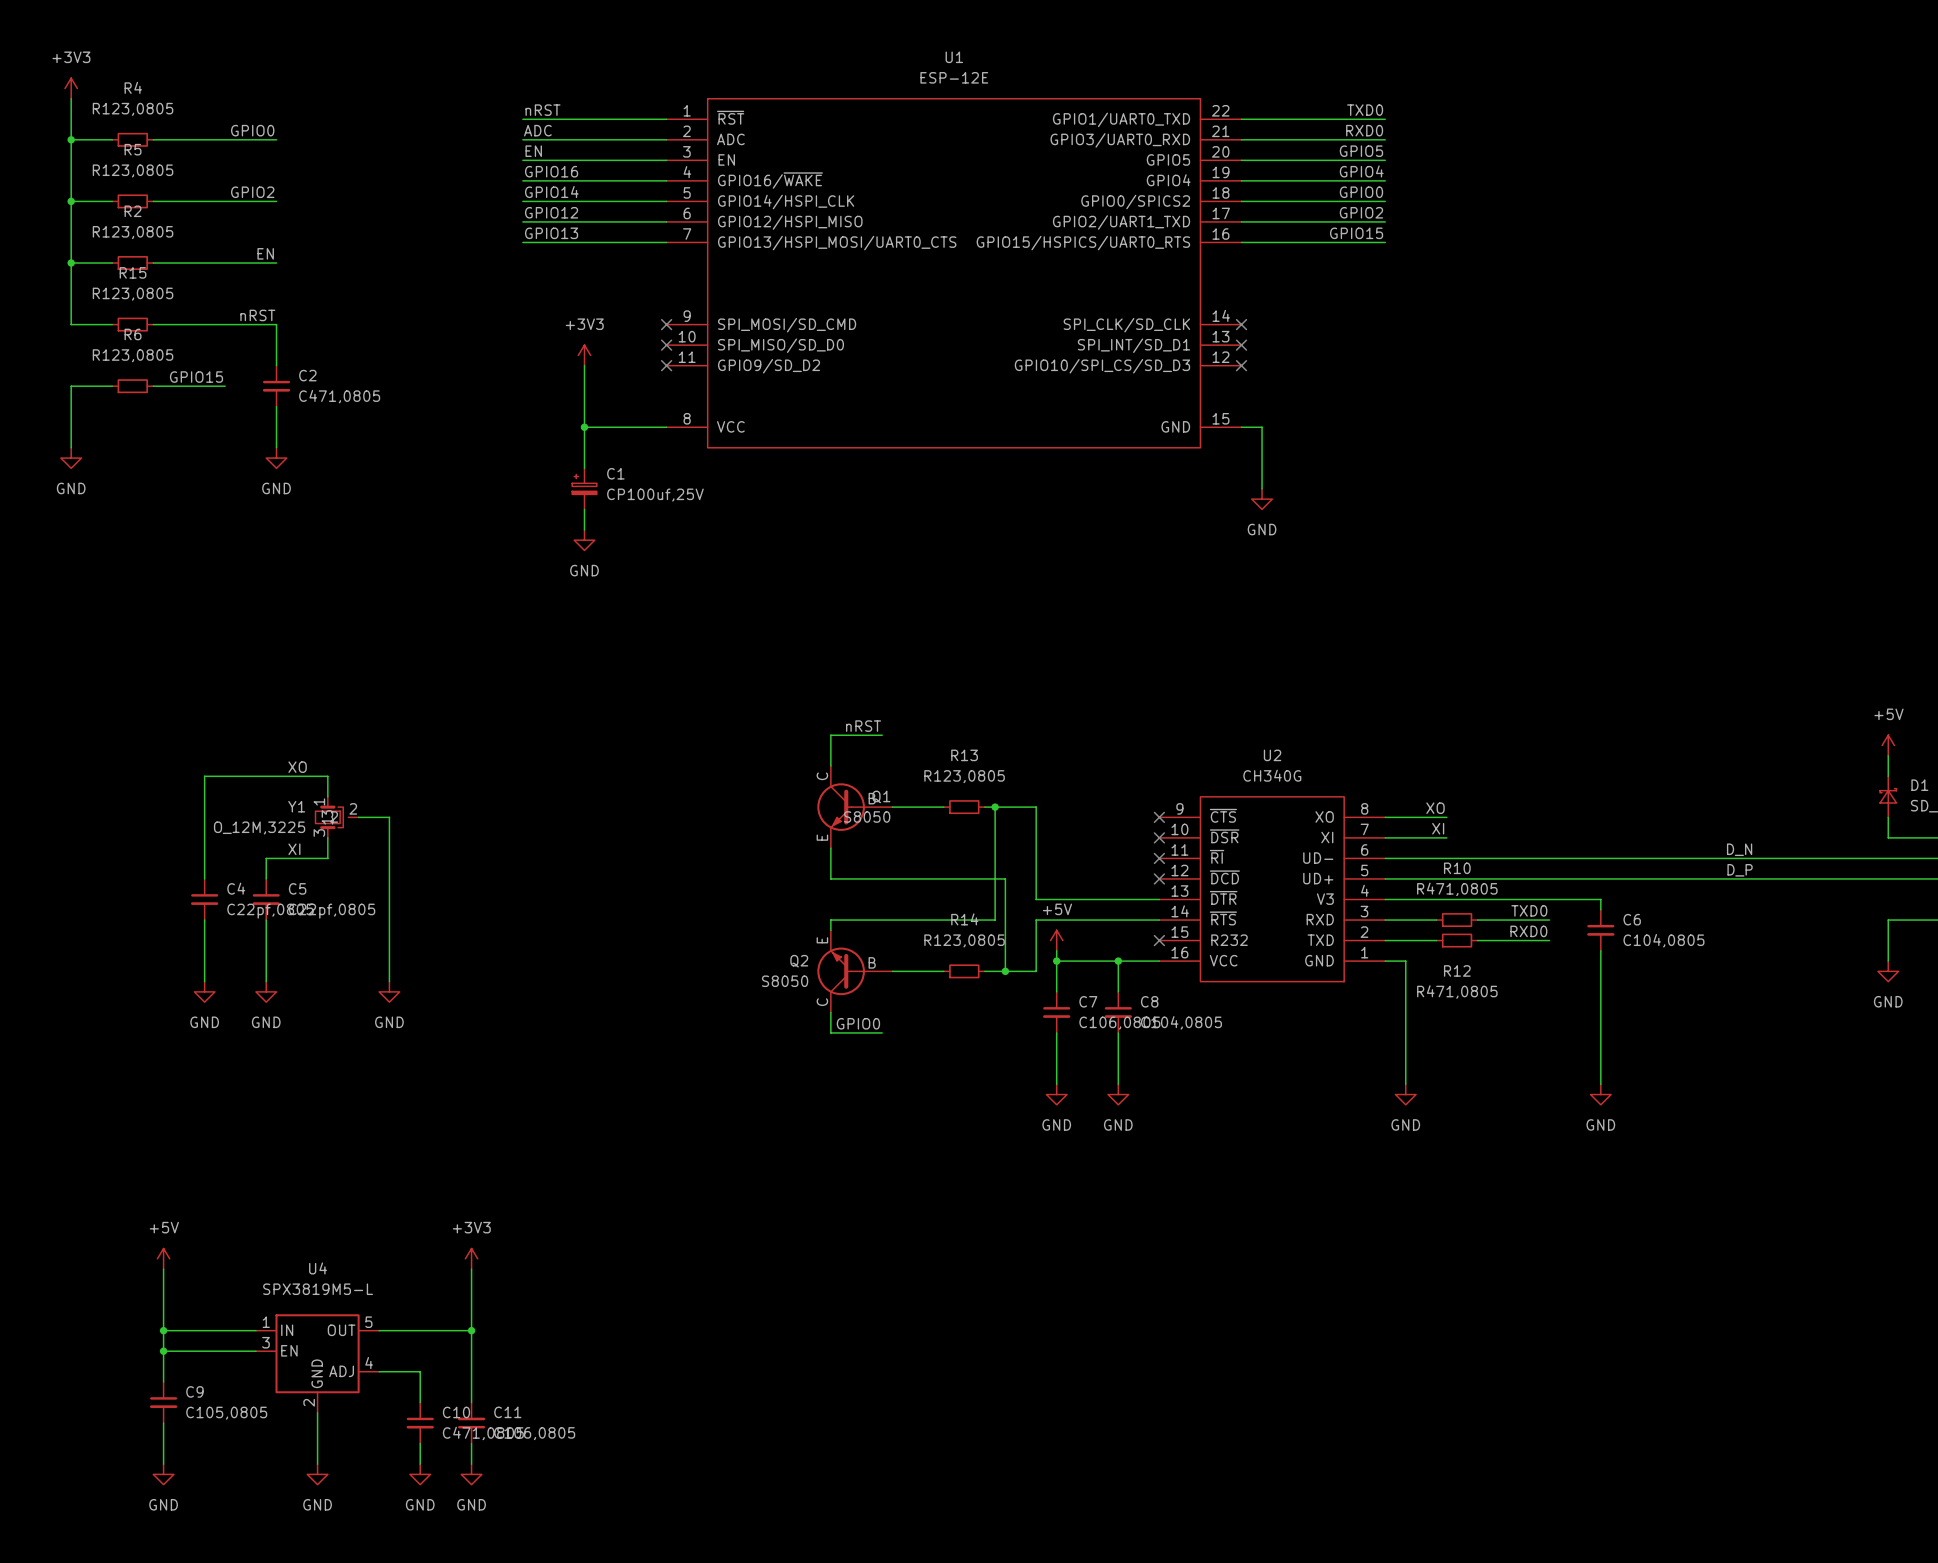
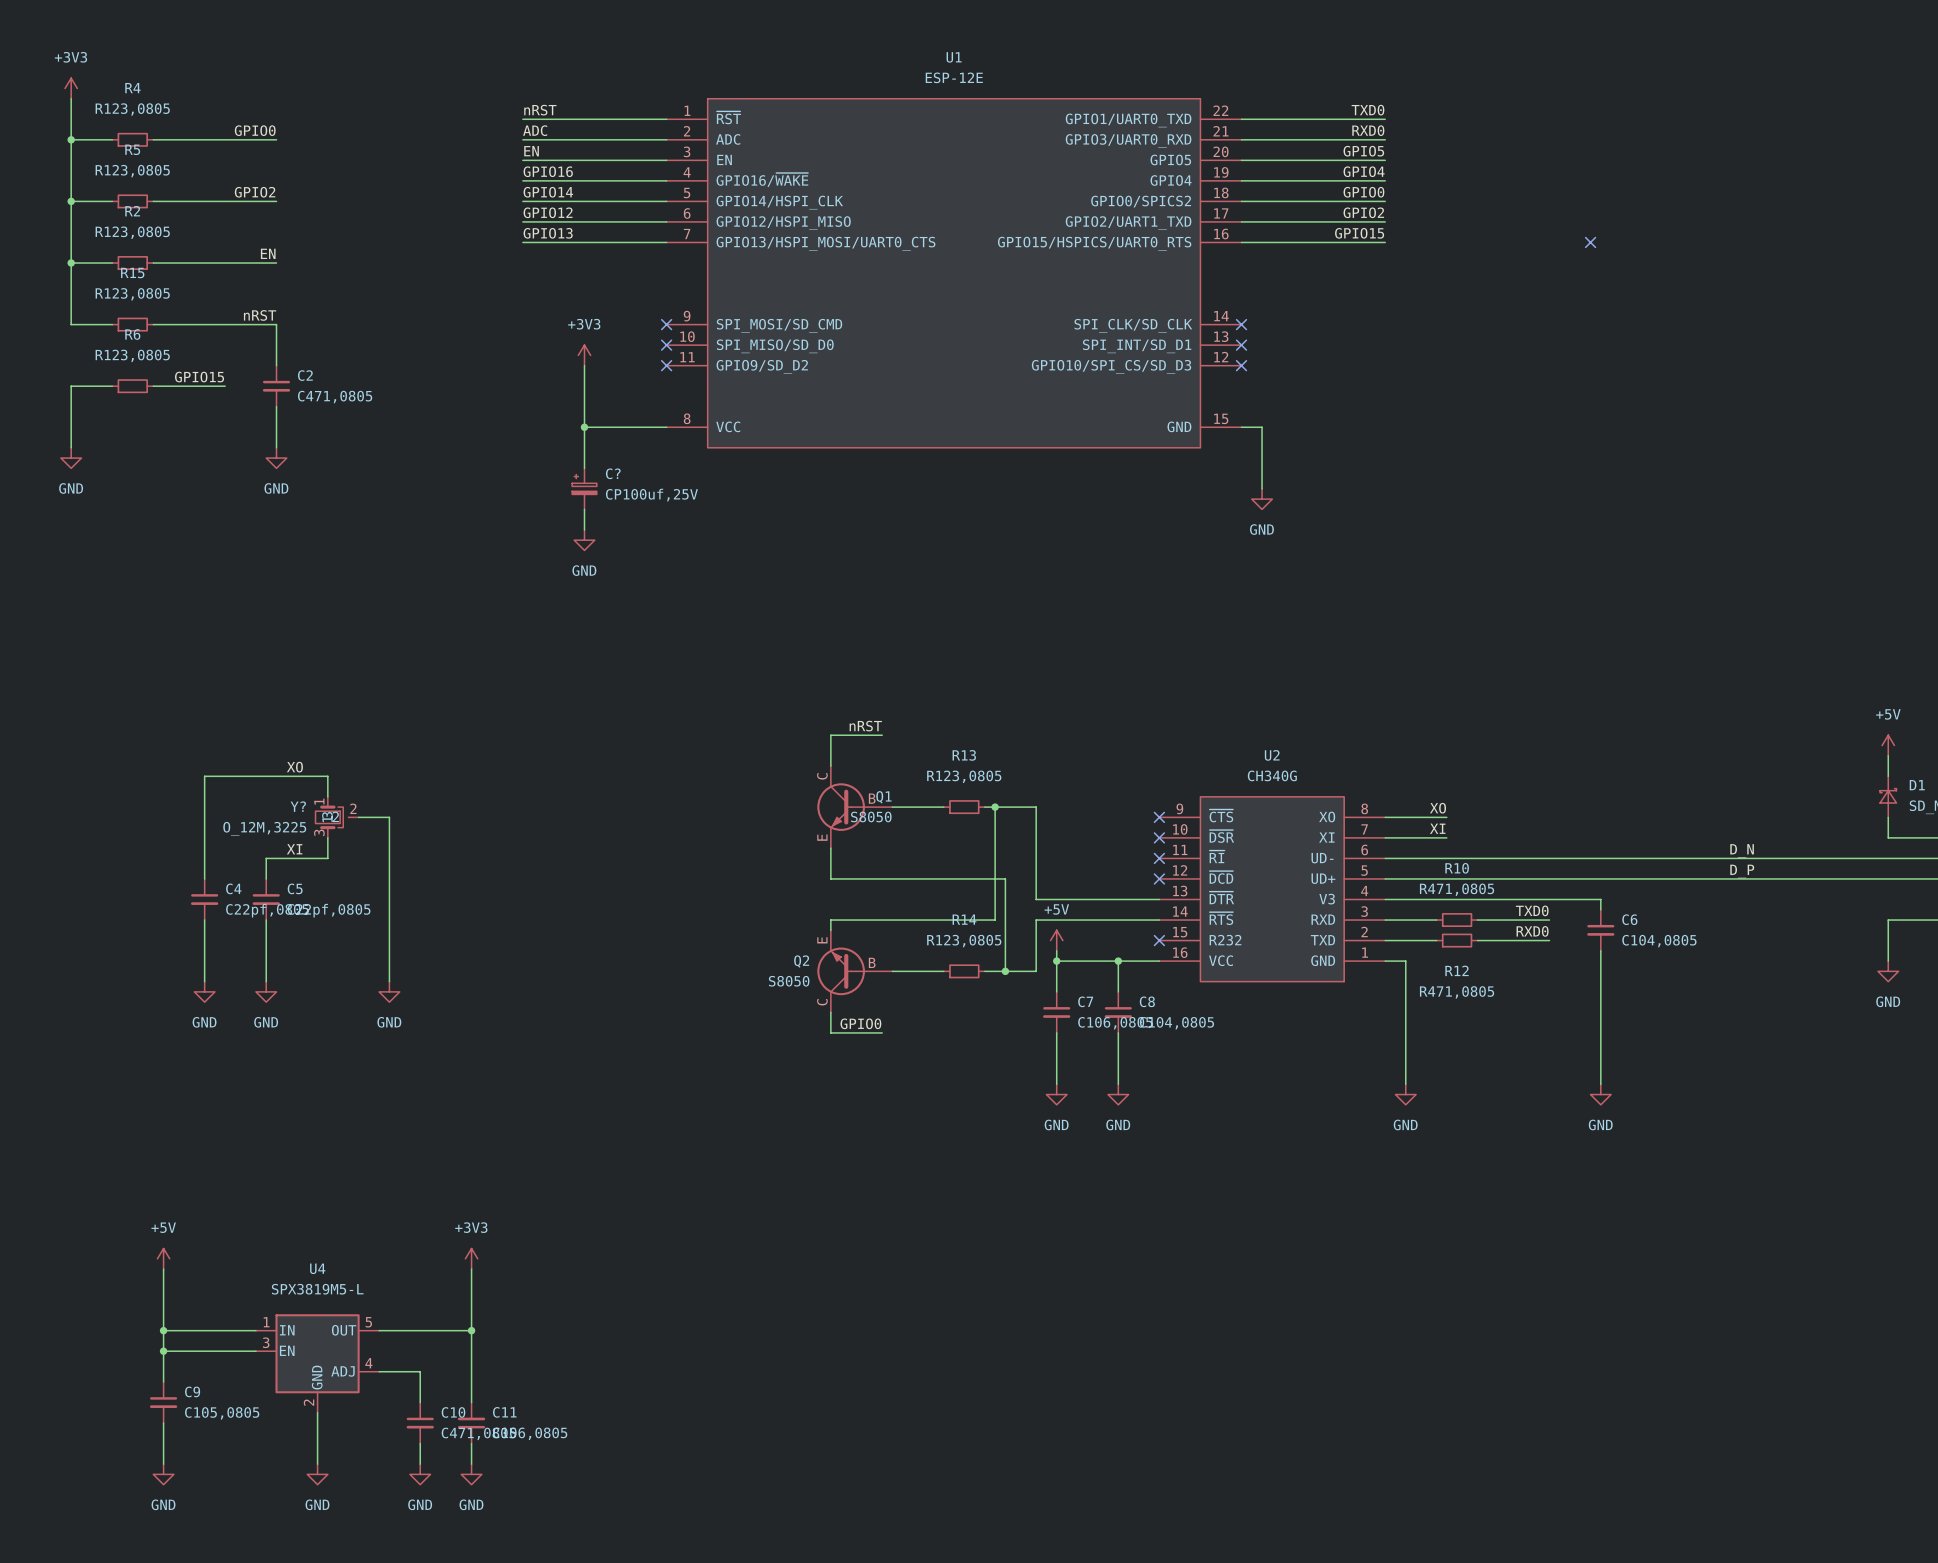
no-connect mark: none -> (1590, 242)
C1 name: C1 (615, 473) -> C? (613, 473)
Y1 name: Y1 (296, 806) -> Y? (298, 806)

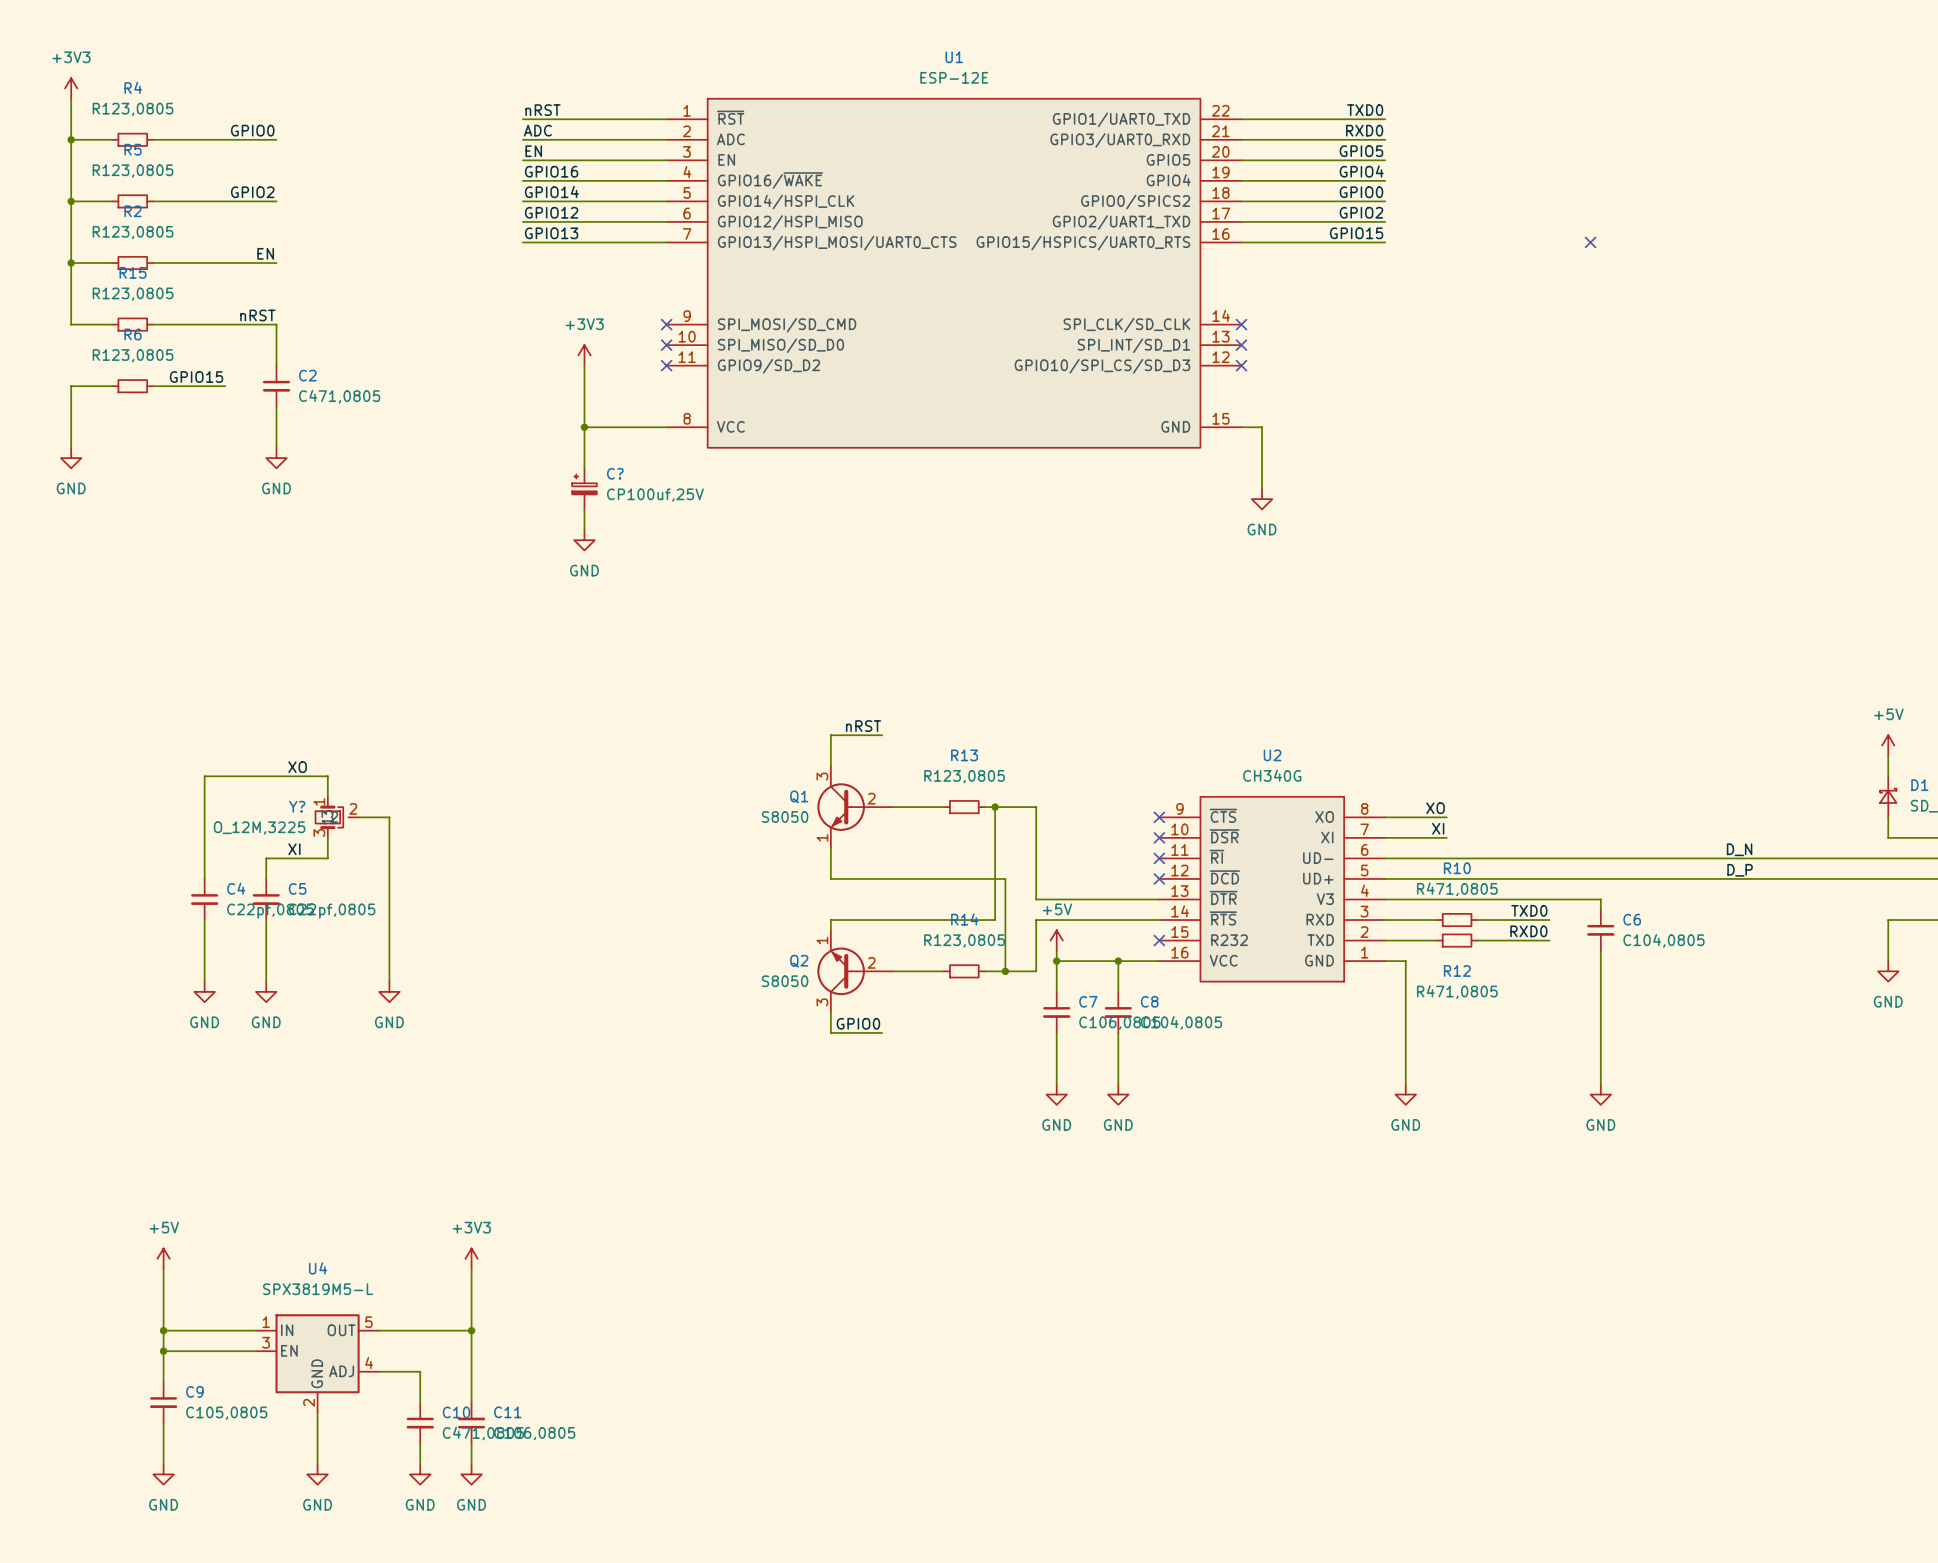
Q1 pin number: C (822, 776) -> 3 (822, 776)
Q1 name position: Q1 (883, 797) -> Q1 (799, 796)
Q1 pin number: B (872, 798) -> 2 (871, 798)
Q1 value position: S8050 (871, 816) -> S8050 (785, 816)
Q1 pin number: E (822, 837) -> 1 (822, 837)
Q2 pin number: E (822, 940) -> 1 (822, 940)
Q2 pin number: B (872, 962) -> 2 (871, 962)
Q2 pin number: C (822, 1002) -> 3 (822, 1002)

